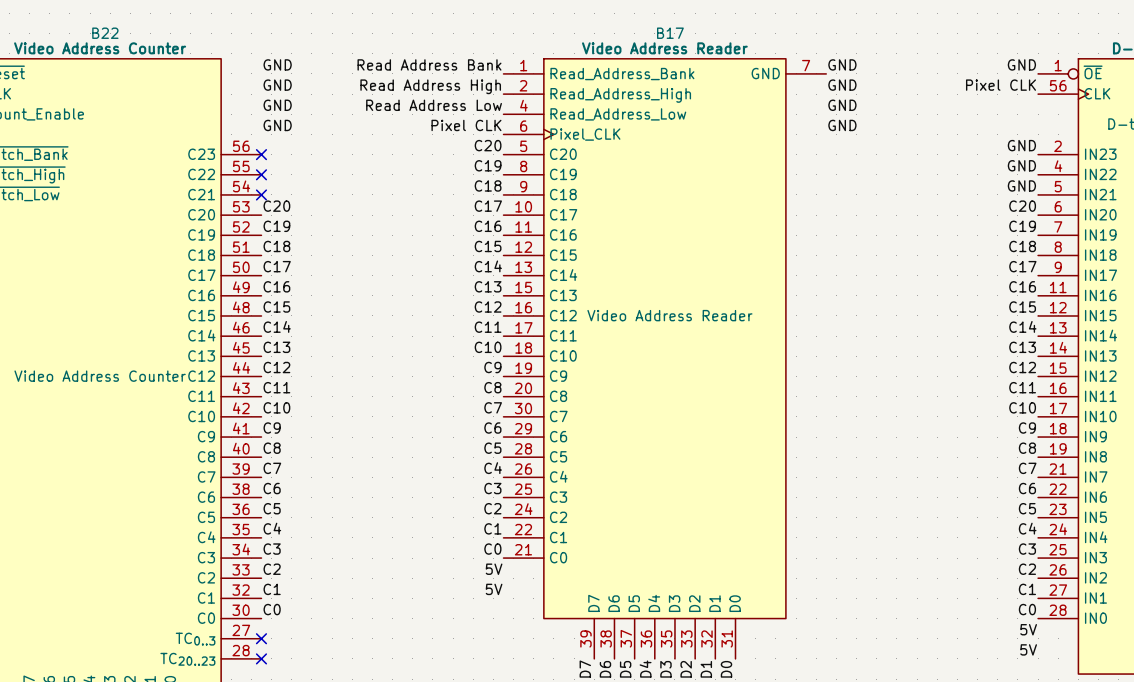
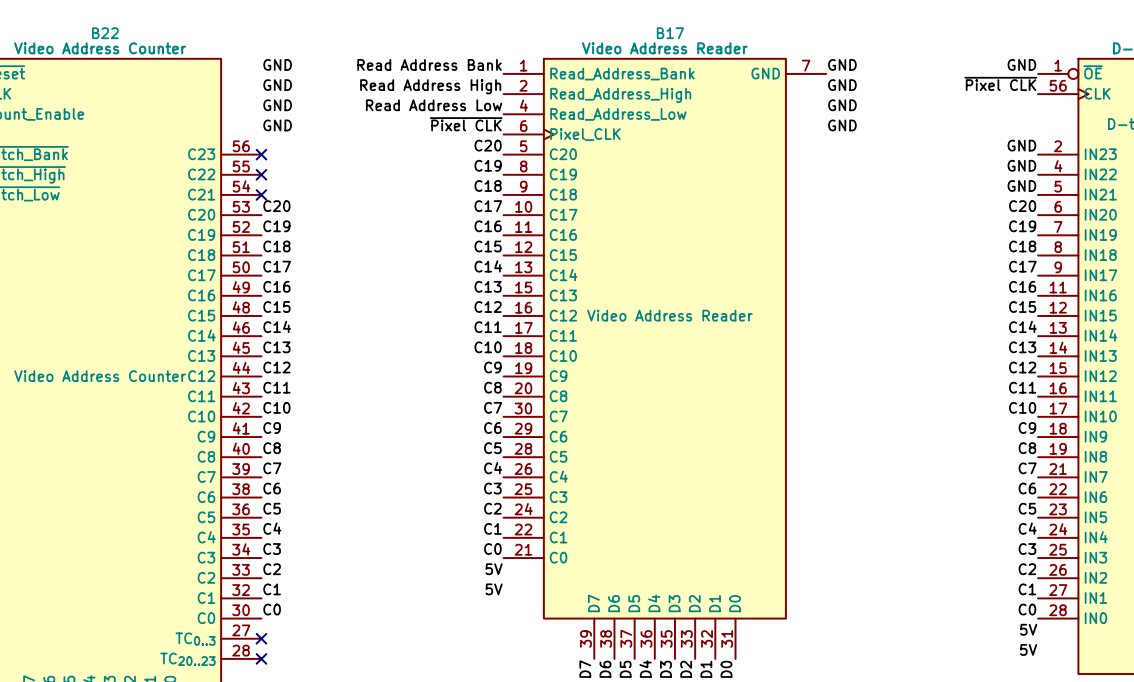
label: Pixel CLK (1001, 85) -> ~{Pixel CLK} (1000, 83)
label: Pixel CLK (466, 125) -> ~{Pixel CLK} (466, 124)

